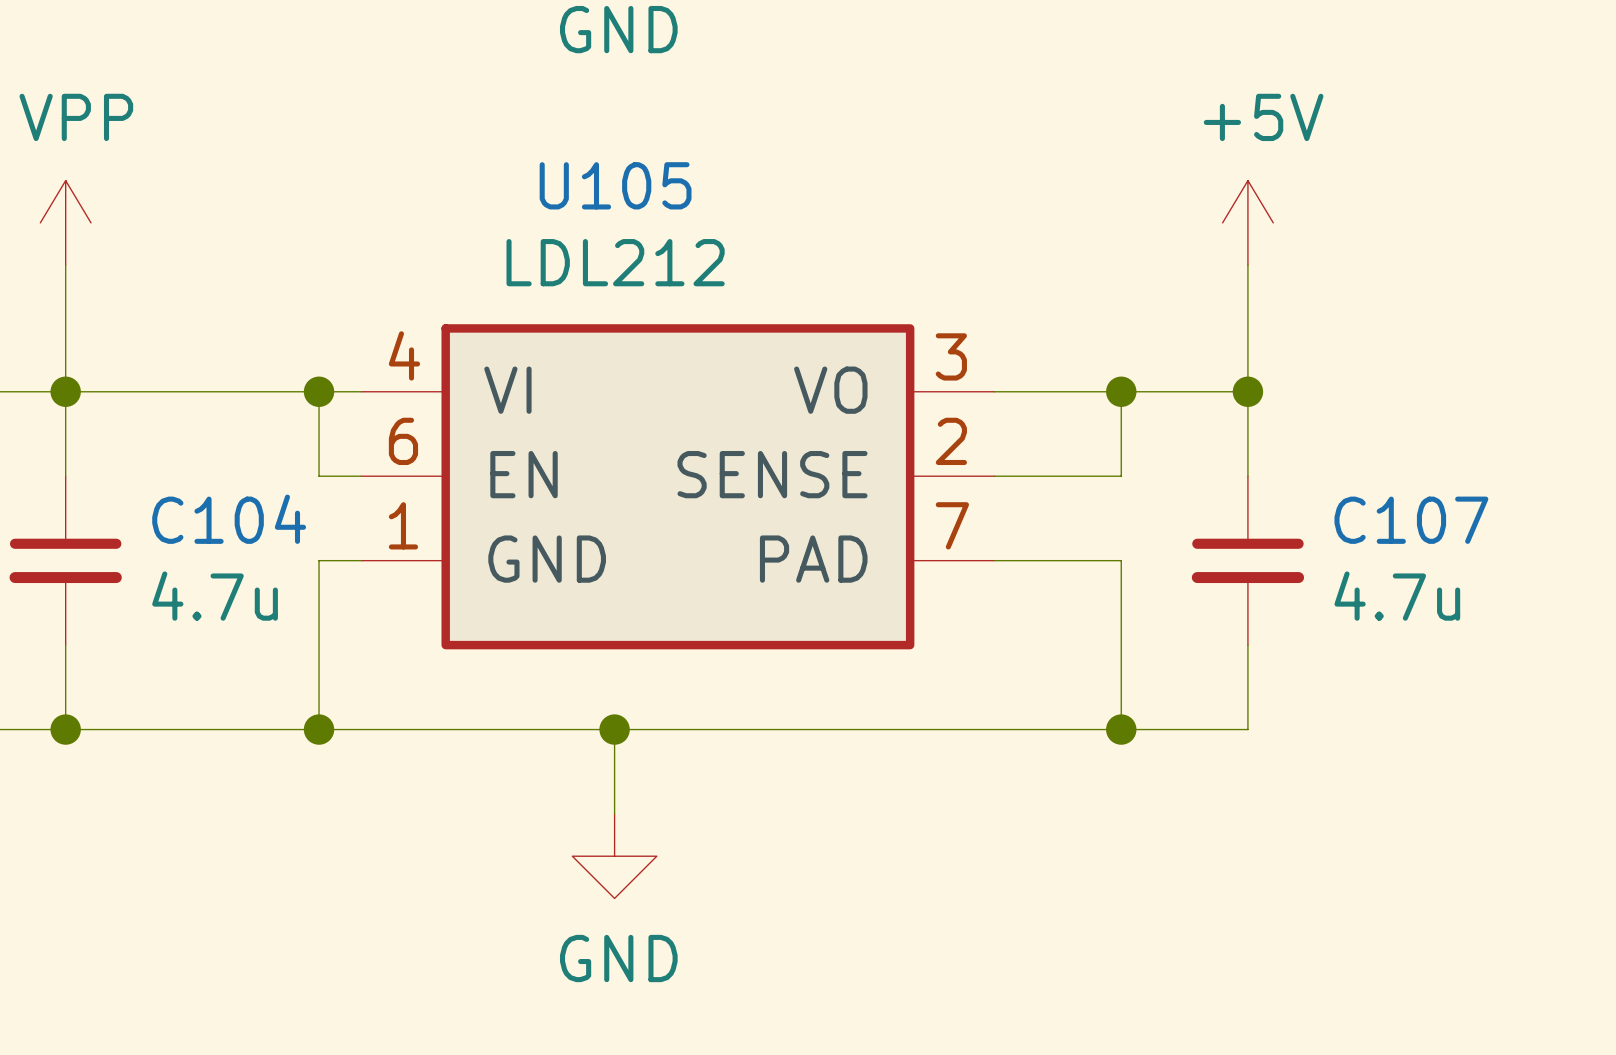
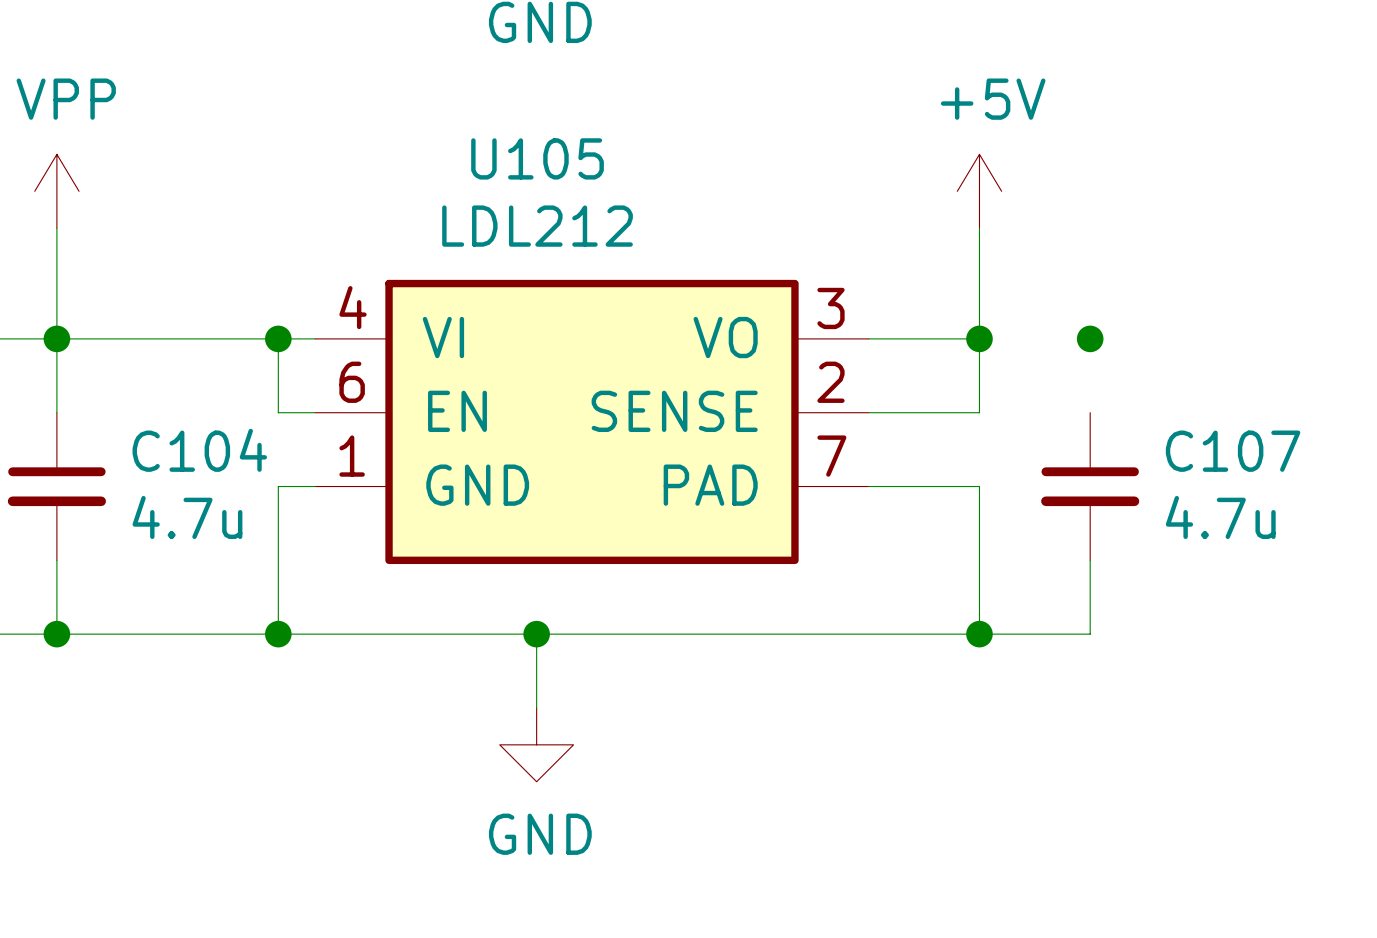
power symbol position: +5V (1247, 222) -> +5V (979, 191)
wire: (1247, 265) (1247, 476) -> none
wire: (1121, 391) (1247, 391) -> (979, 338) (979, 228)

